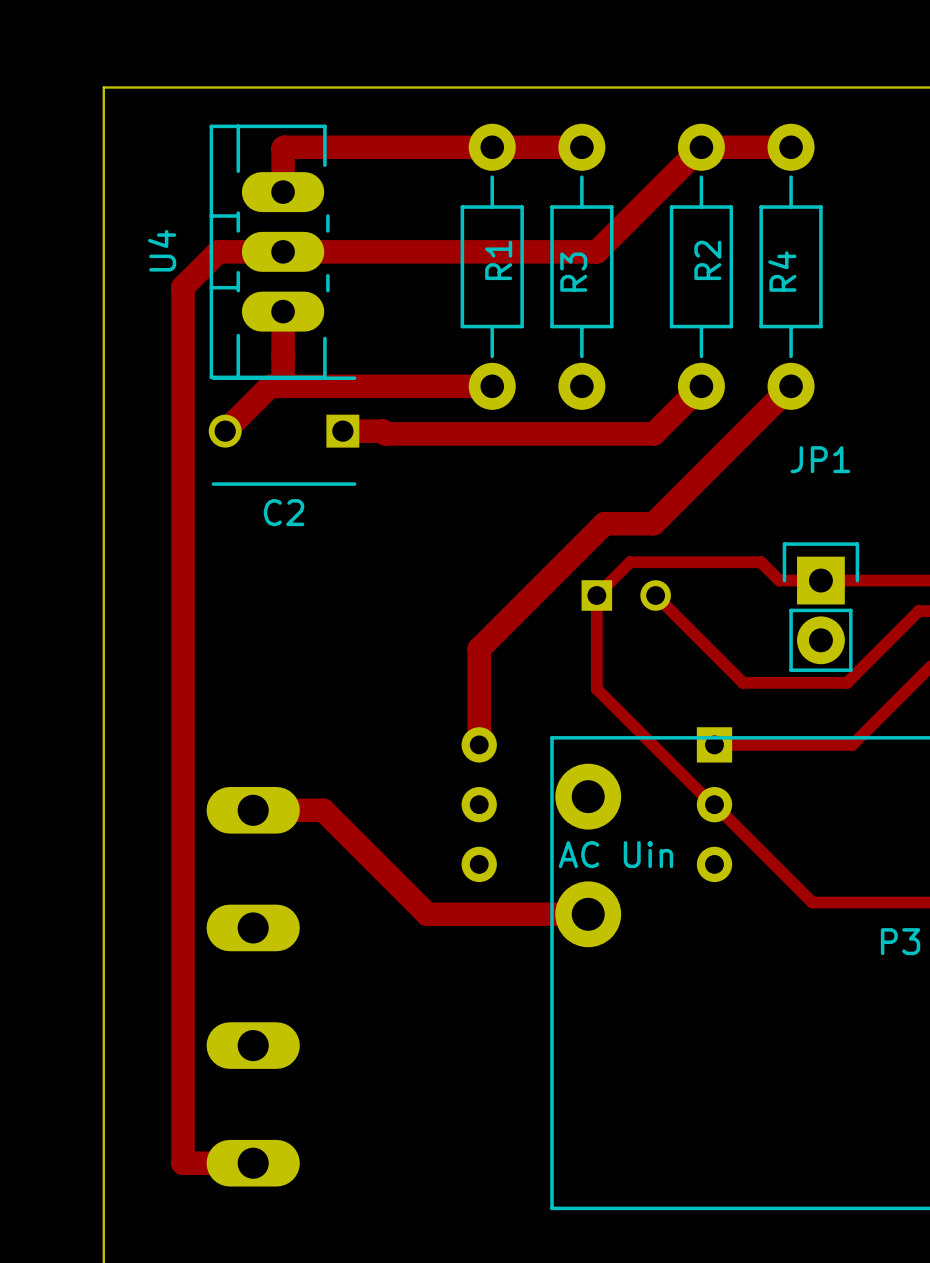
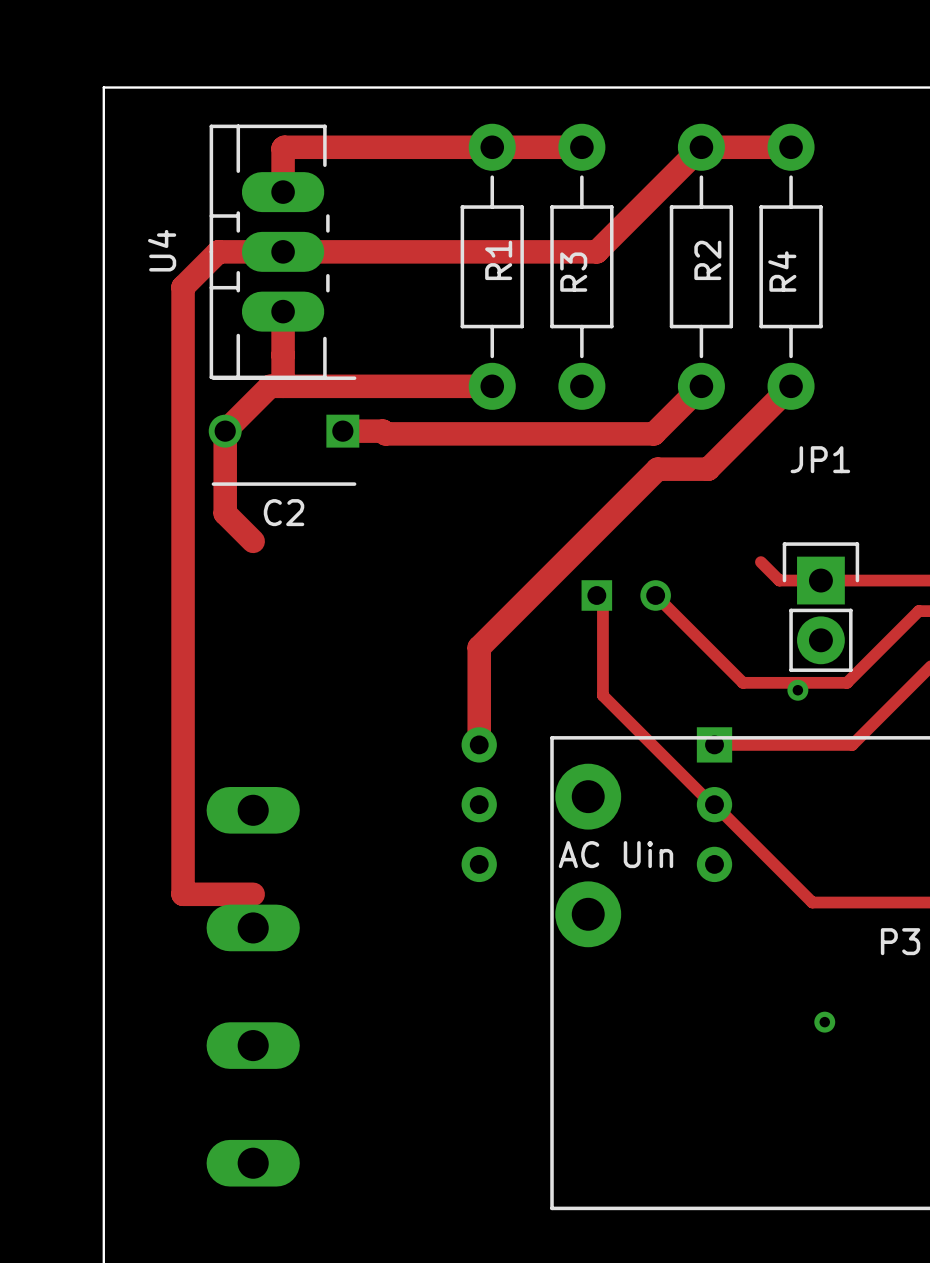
track: none -> (225, 431) (225, 513) (253, 541)
track: (708, 469) (653, 523) (604, 523) (479, 649) -> (708, 469) (657, 469) (479, 649)
track: (761, 562) (630, 562) (596, 595) (596, 689) (712, 804) -> (602, 595) (602, 695) (712, 804)
via: none -> (797, 690)
track: (253, 810) (323, 810) (427, 914) (588, 914) -> none
track: (183, 894) (183, 1163) (253, 1163) -> (183, 894) (253, 894)
via: none -> (824, 1022)

